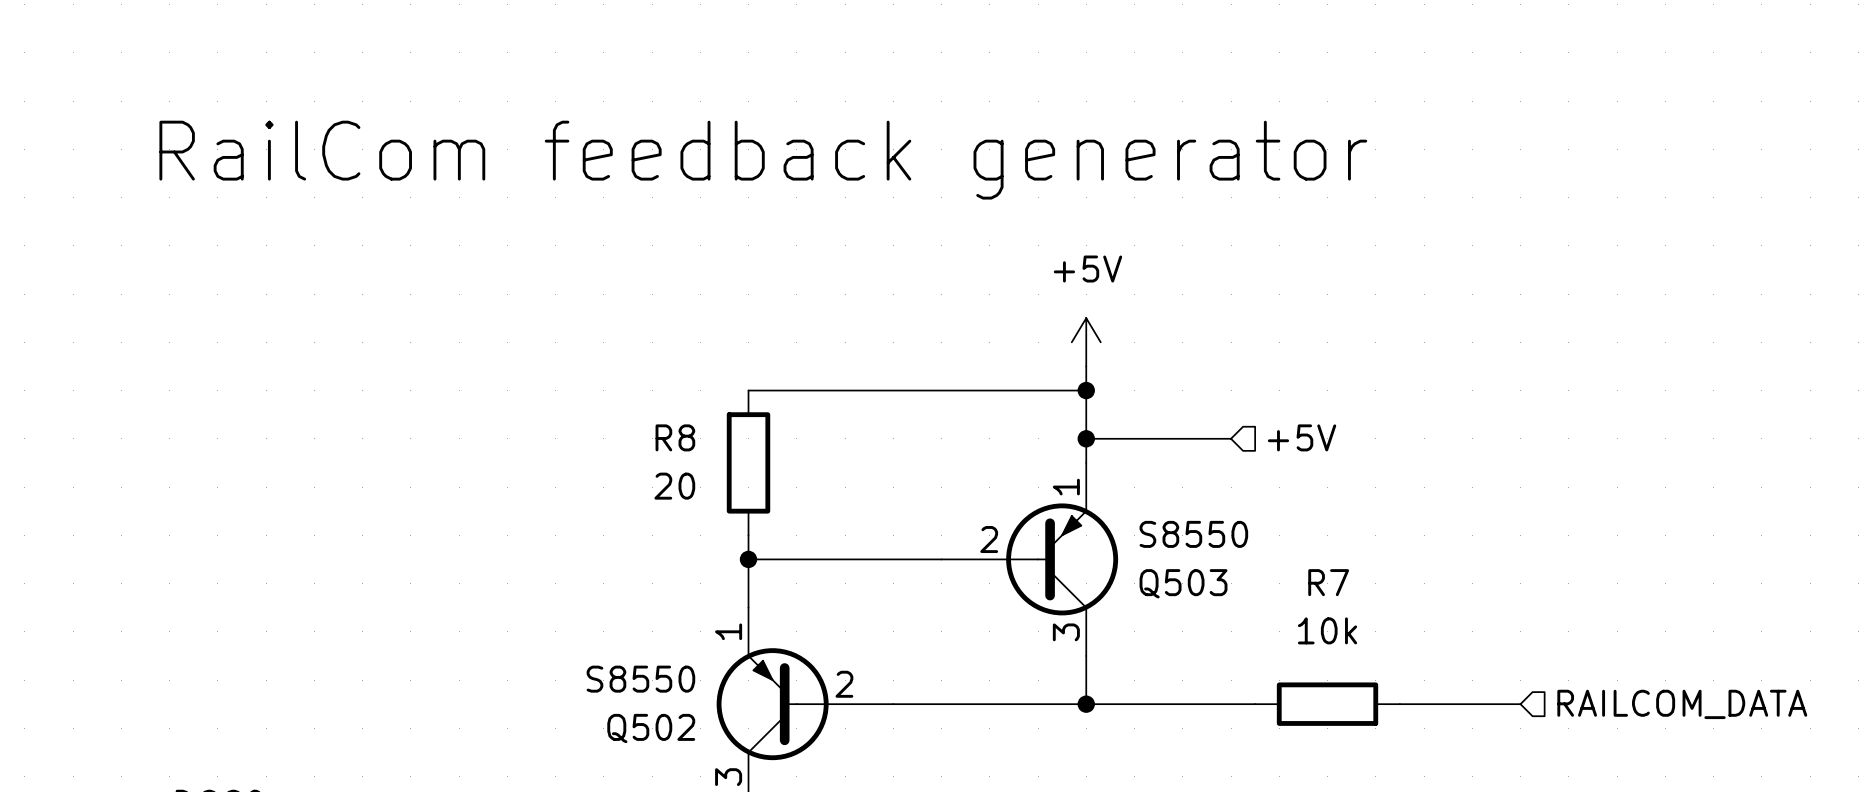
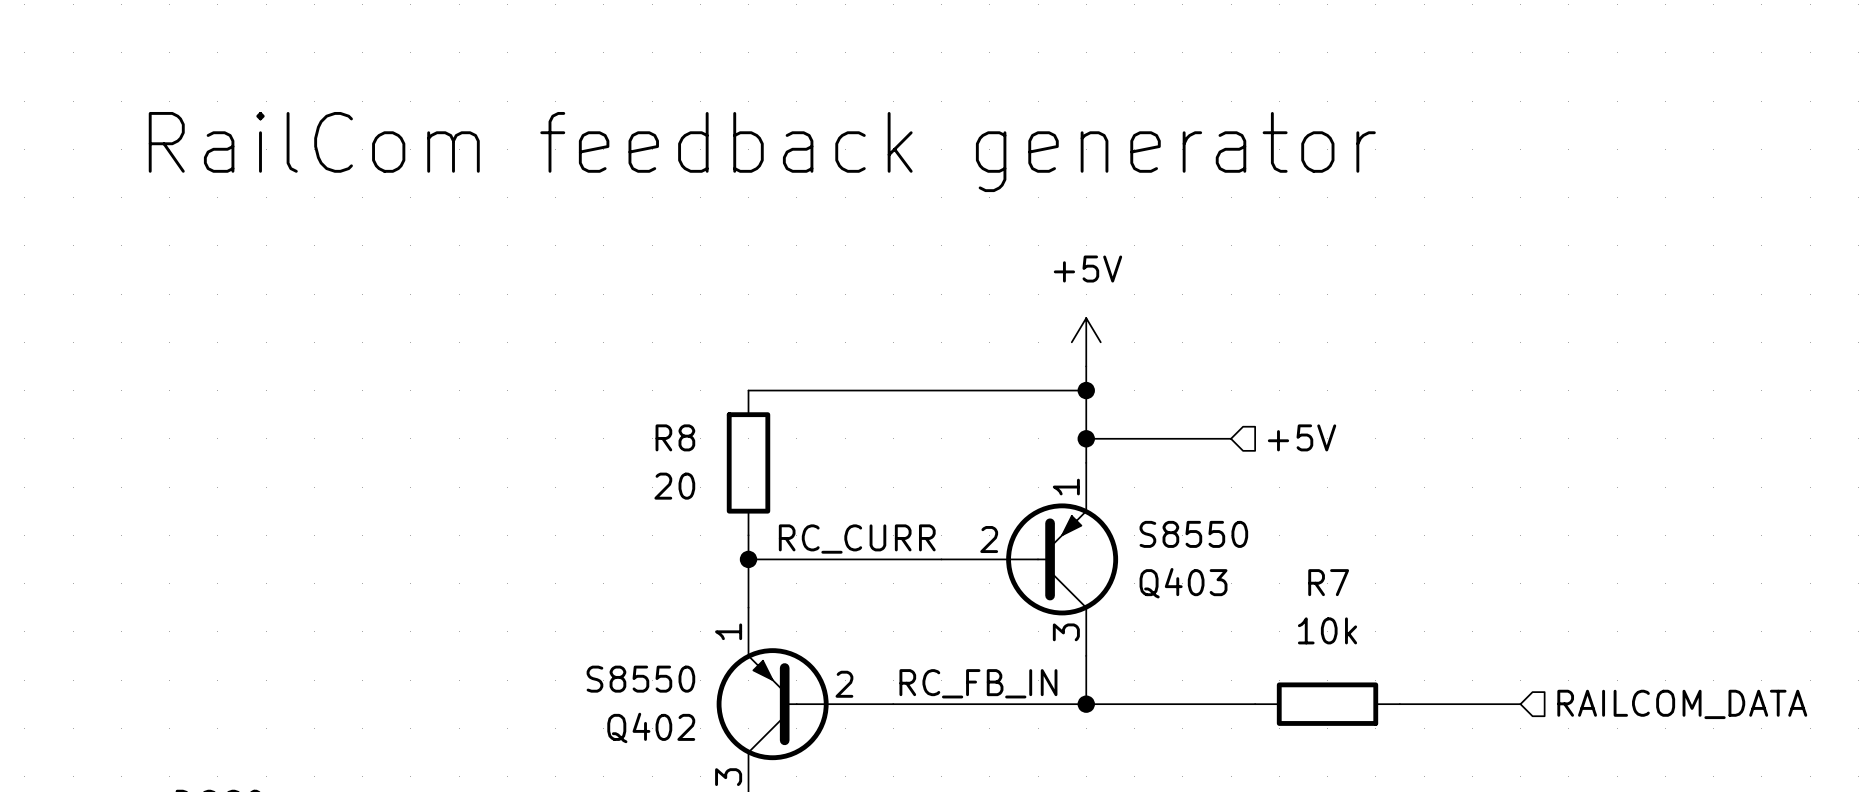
text: none -> RailCom feedback generator (762, 152)
label: RailCom feedback generator (763, 160) -> none
label: none -> RC_CURR (857, 539)
Q503 name: Q503 (1183, 583) -> Q403 (1183, 583)
label: none -> RC_FB_IN (978, 683)
Q502 name: Q502 (651, 728) -> Q402 (651, 727)

